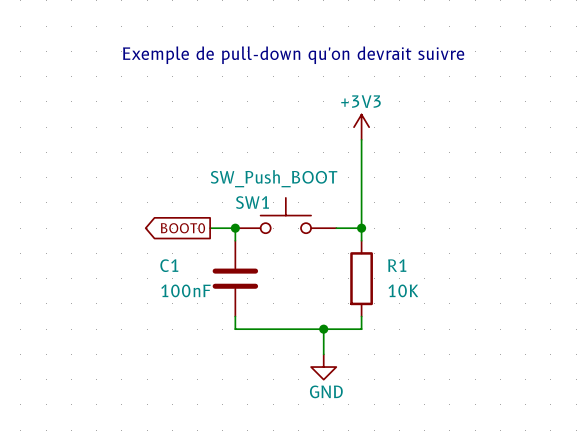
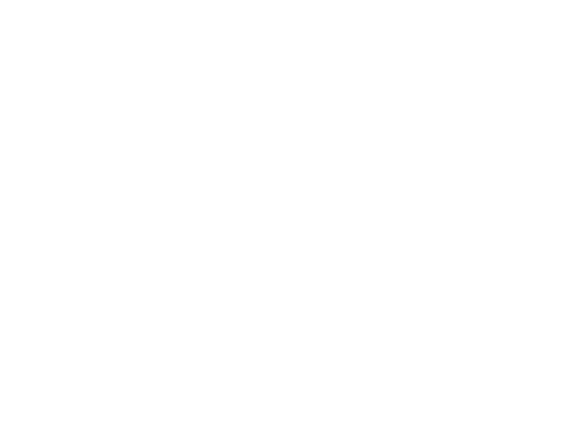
text: Exemple de pull-down qu'on devrait suivre (293, 55) -> none
power symbol: +3V3 (361, 127) -> none
wire: (361, 139) (361, 240) -> none
SW1: SW_Push_BOOT (285, 215) -> none
global label: BOOT0 (182, 228) -> none
wire: (210, 228) (235, 228) (235, 240) -> none
junction: (235, 228) -> none
wire: (336, 228) (361, 228) -> none
junction: (361, 228) -> none
C1: 100nF (235, 278) -> none
R1: 10K (361, 278) -> none
wire: (235, 316) (235, 329) (361, 329) (361, 316) -> none
wire: (323, 329) (323, 354) -> none
junction: (323, 329) -> none
power symbol: GND (323, 367) -> none

